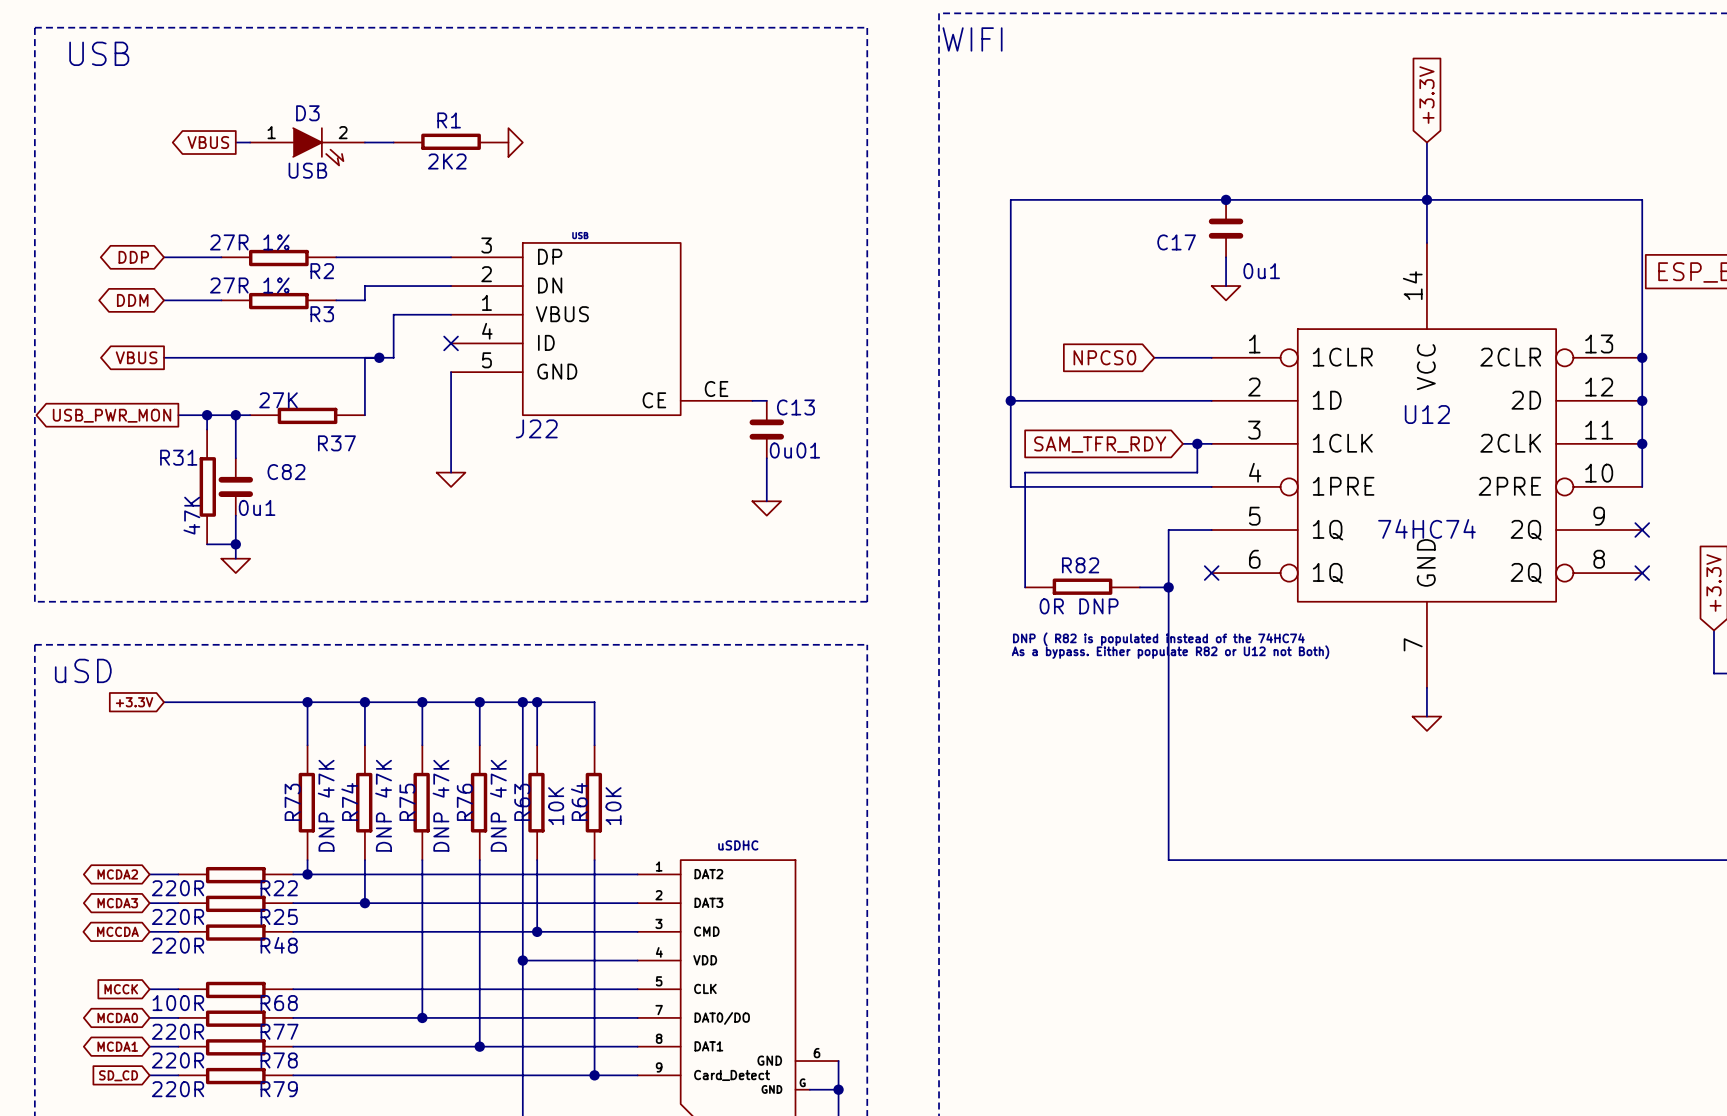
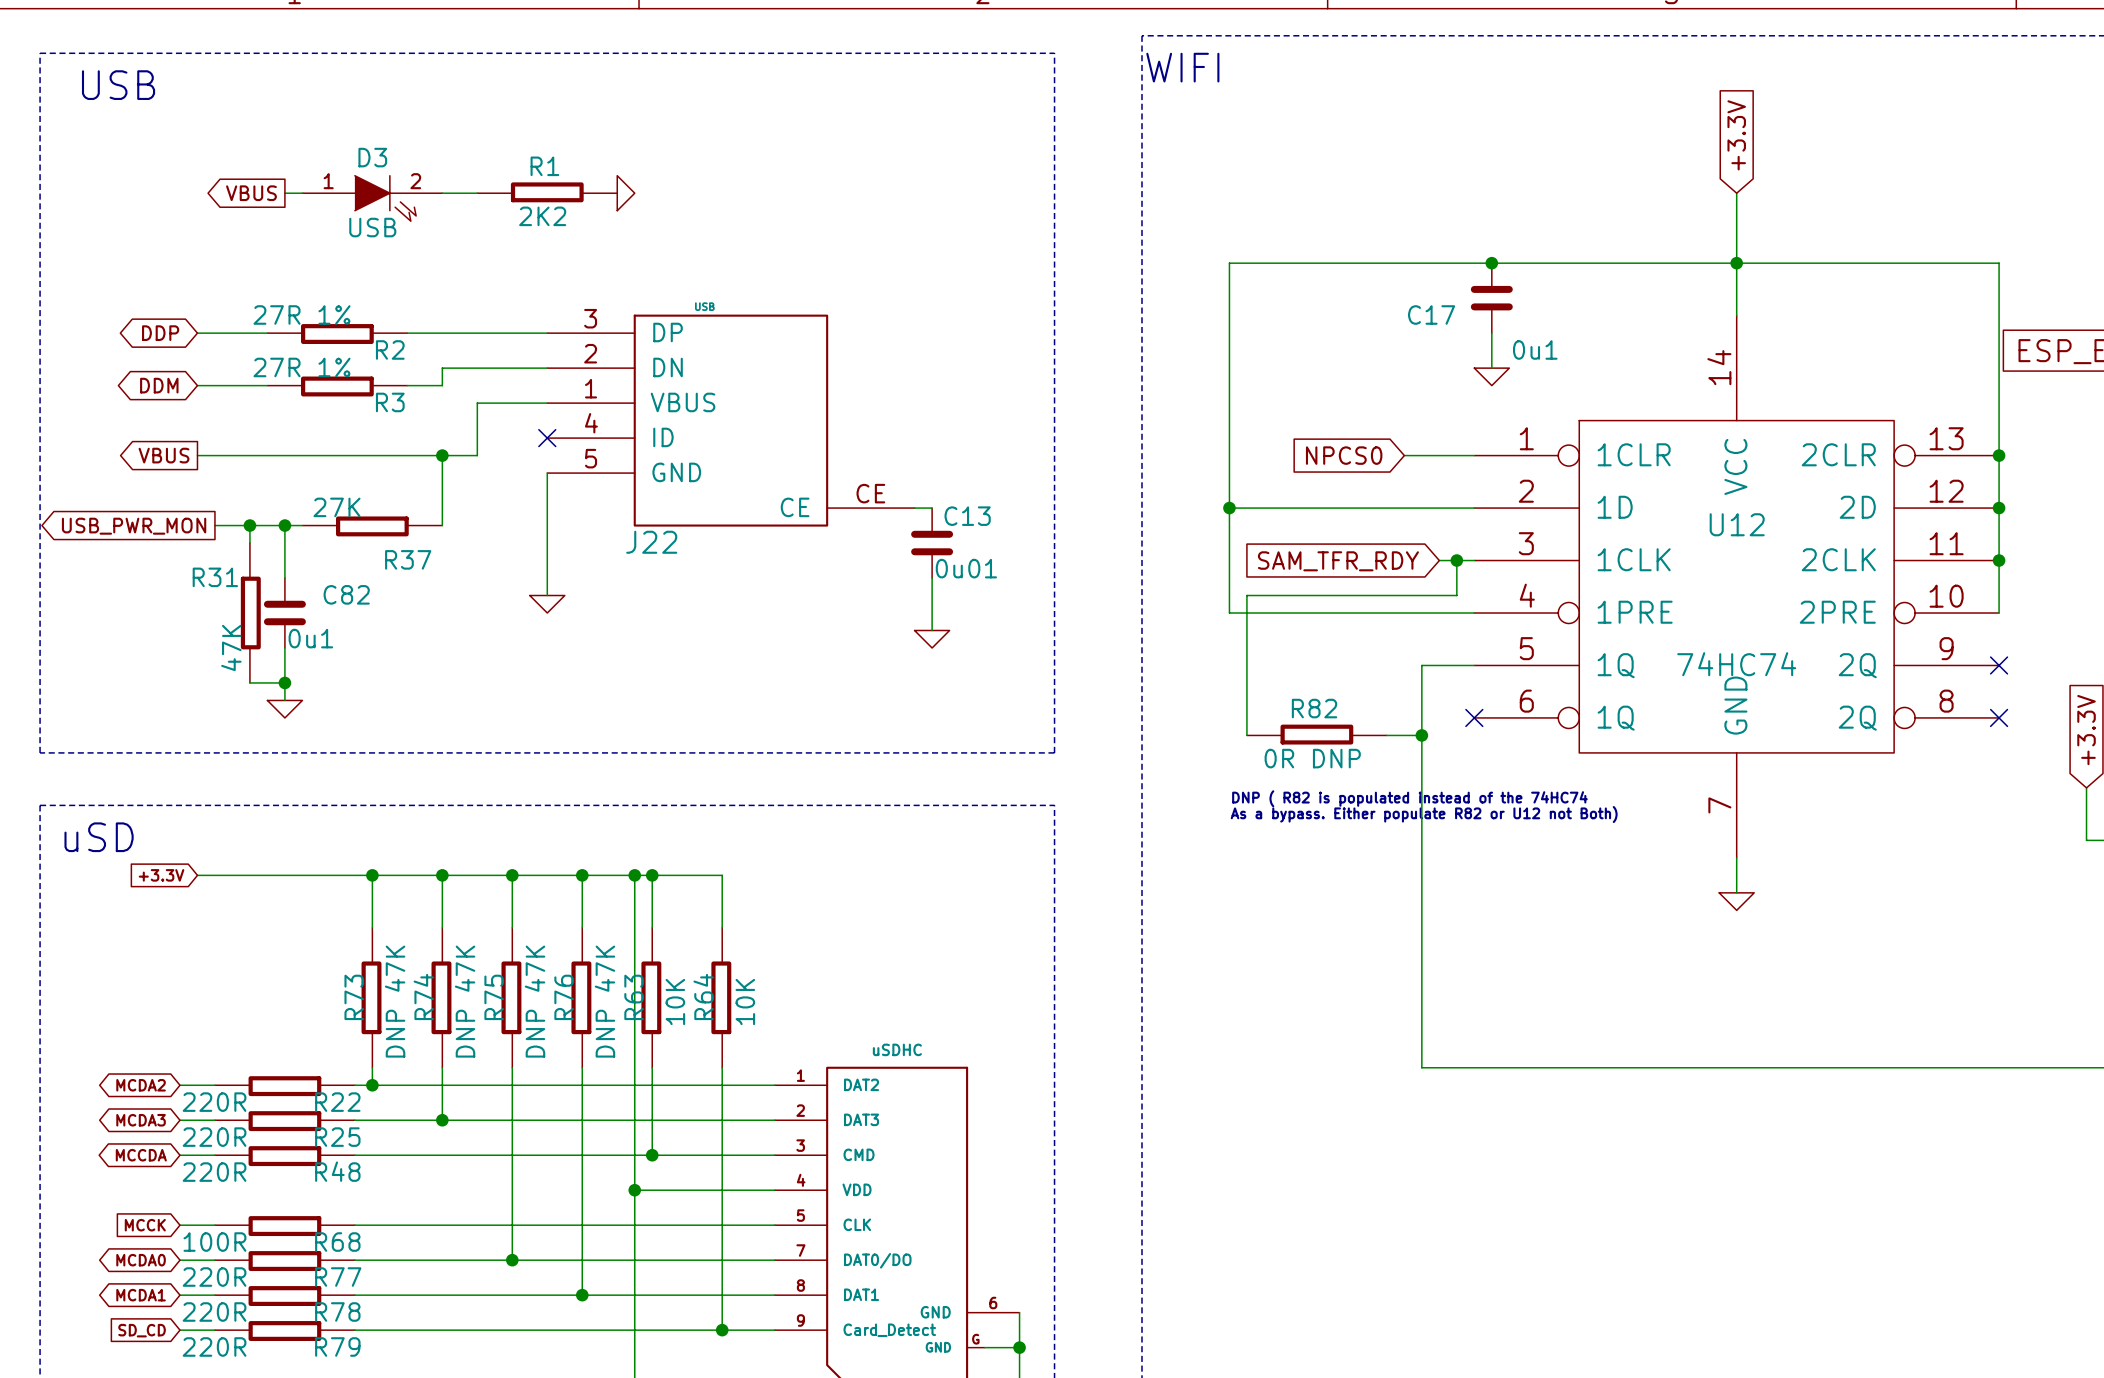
junction position: (379, 357) -> (442, 455)

